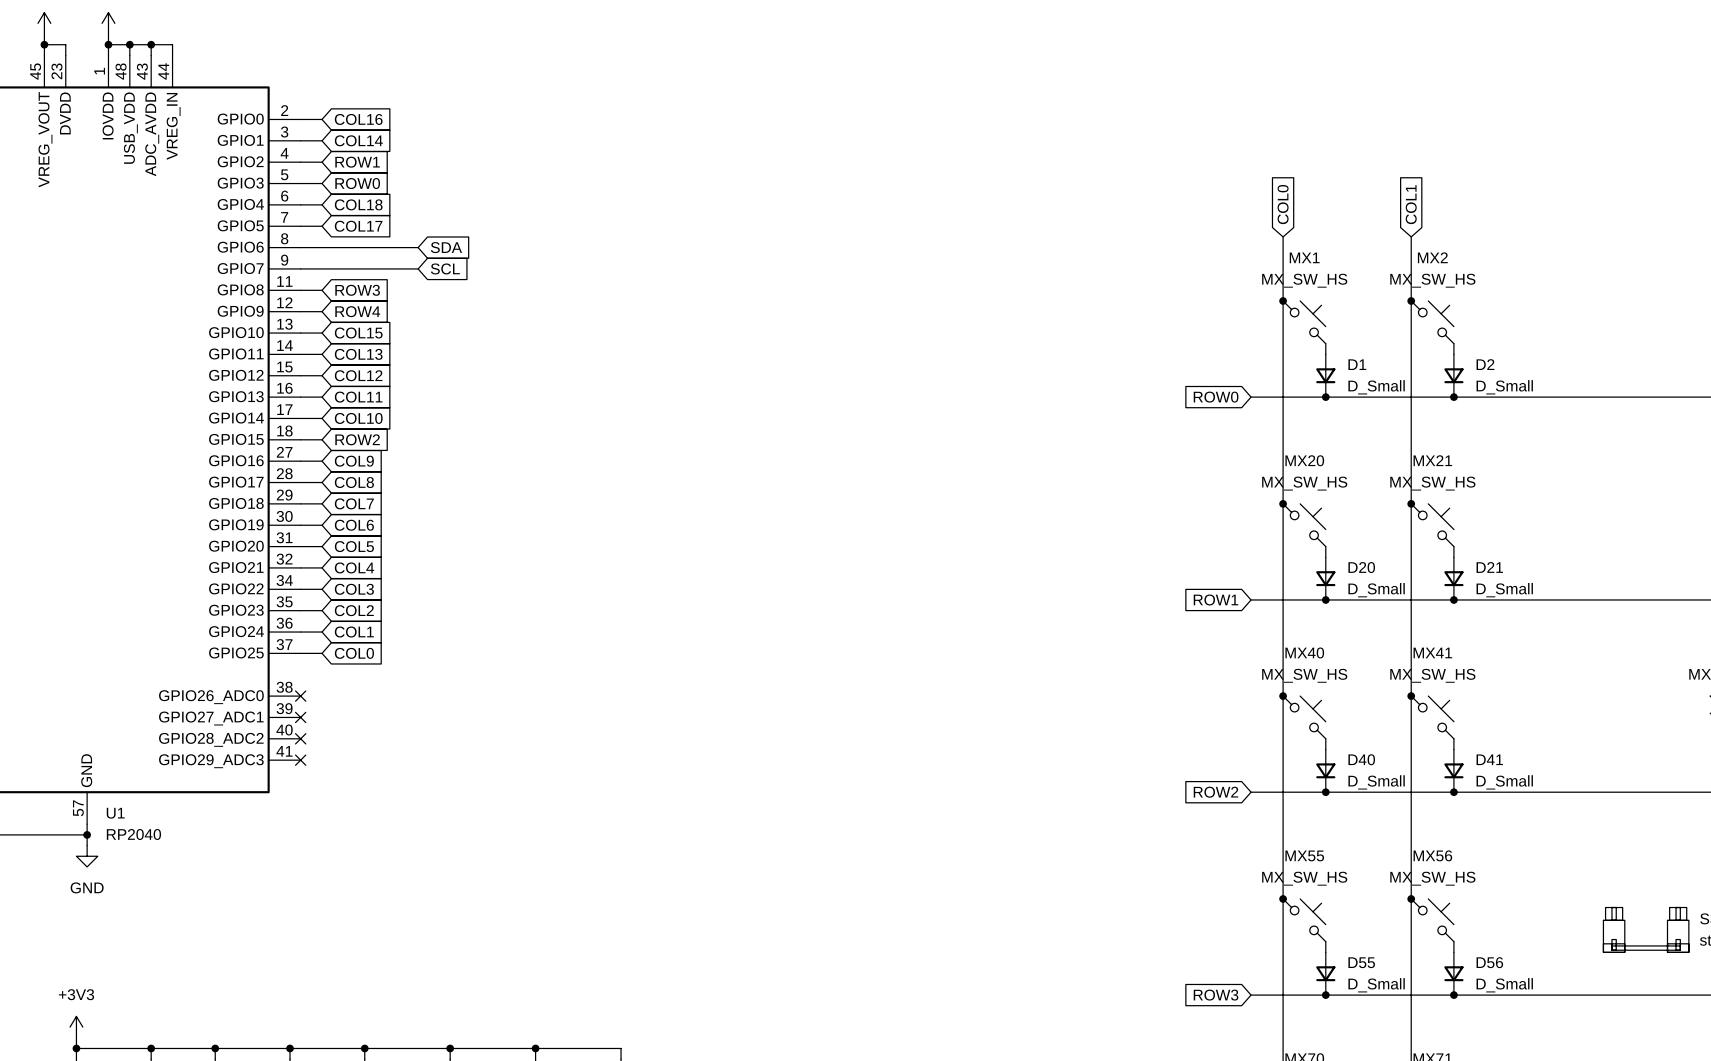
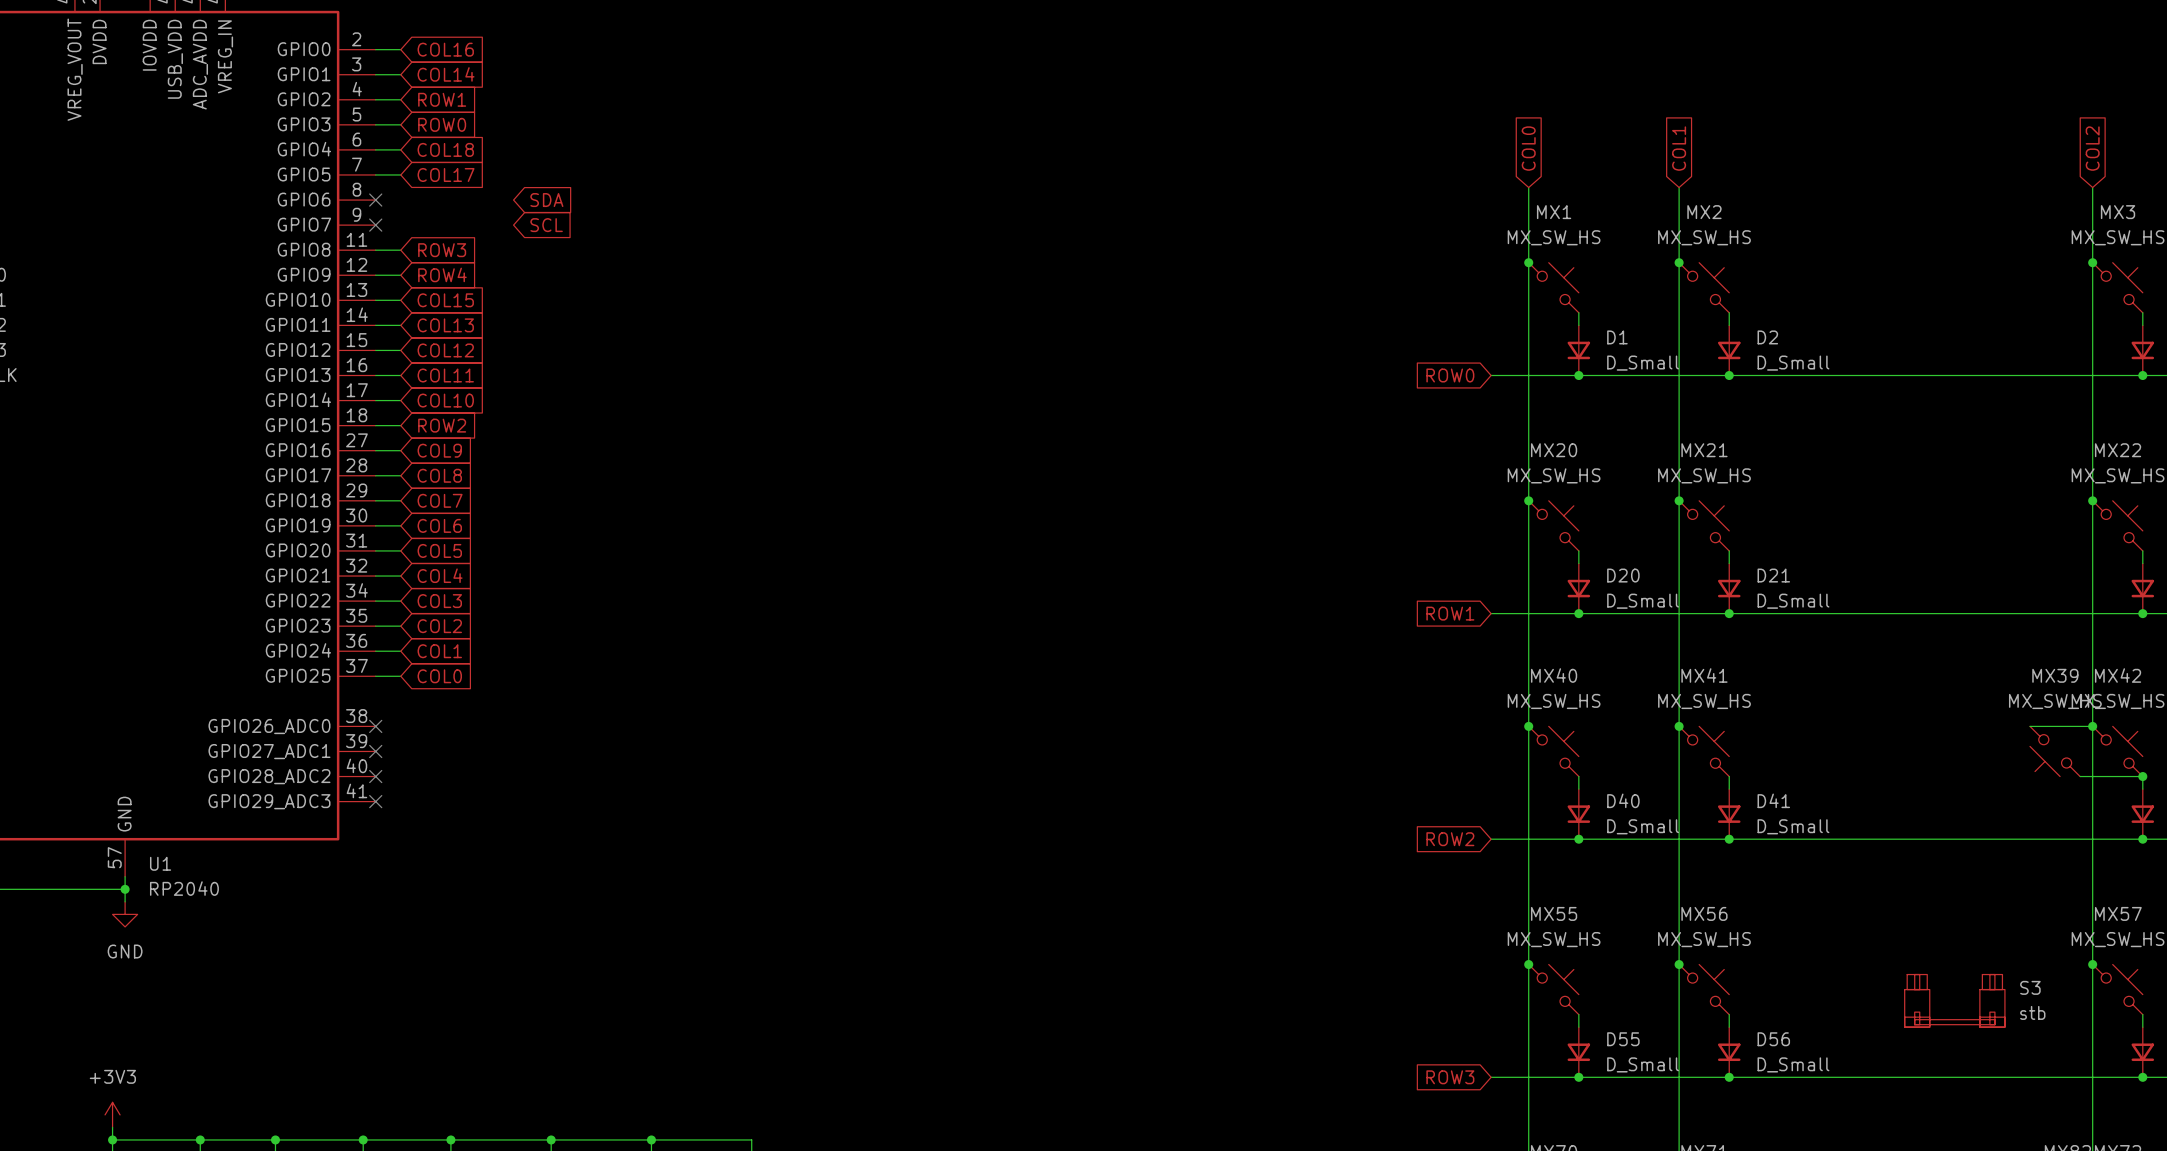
wire: (300, 247) (418, 247) -> none
no-connect mark: none -> (375, 200)
wire: (300, 268) (418, 268) -> none
no-connect mark: none -> (375, 225)

